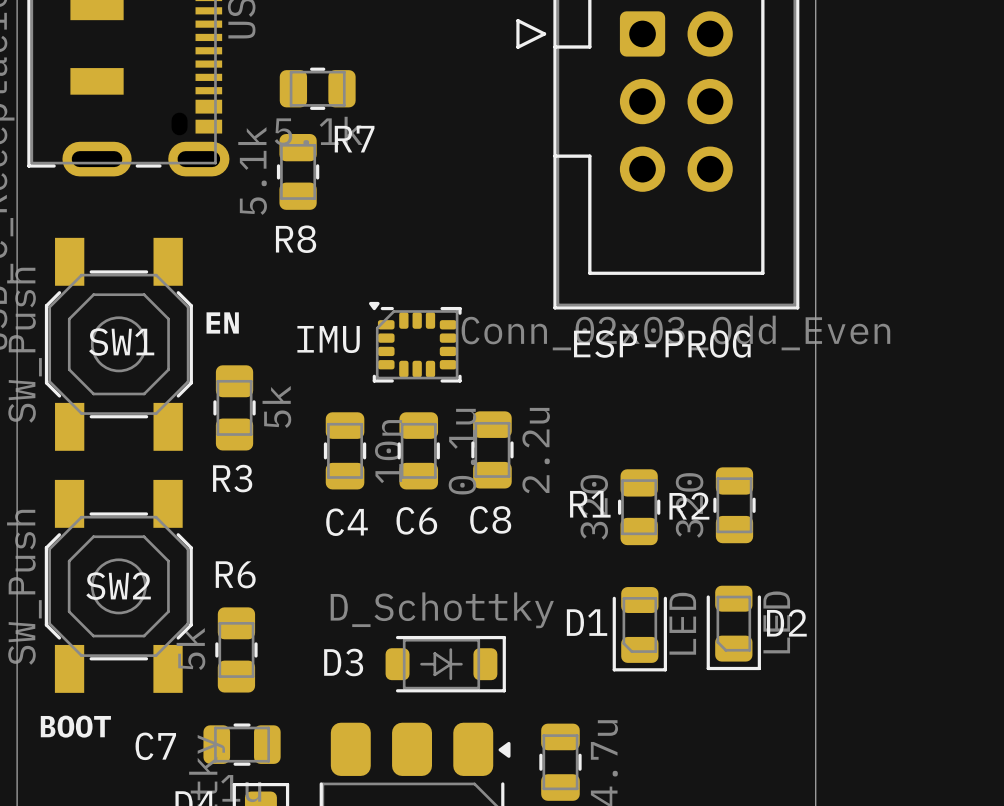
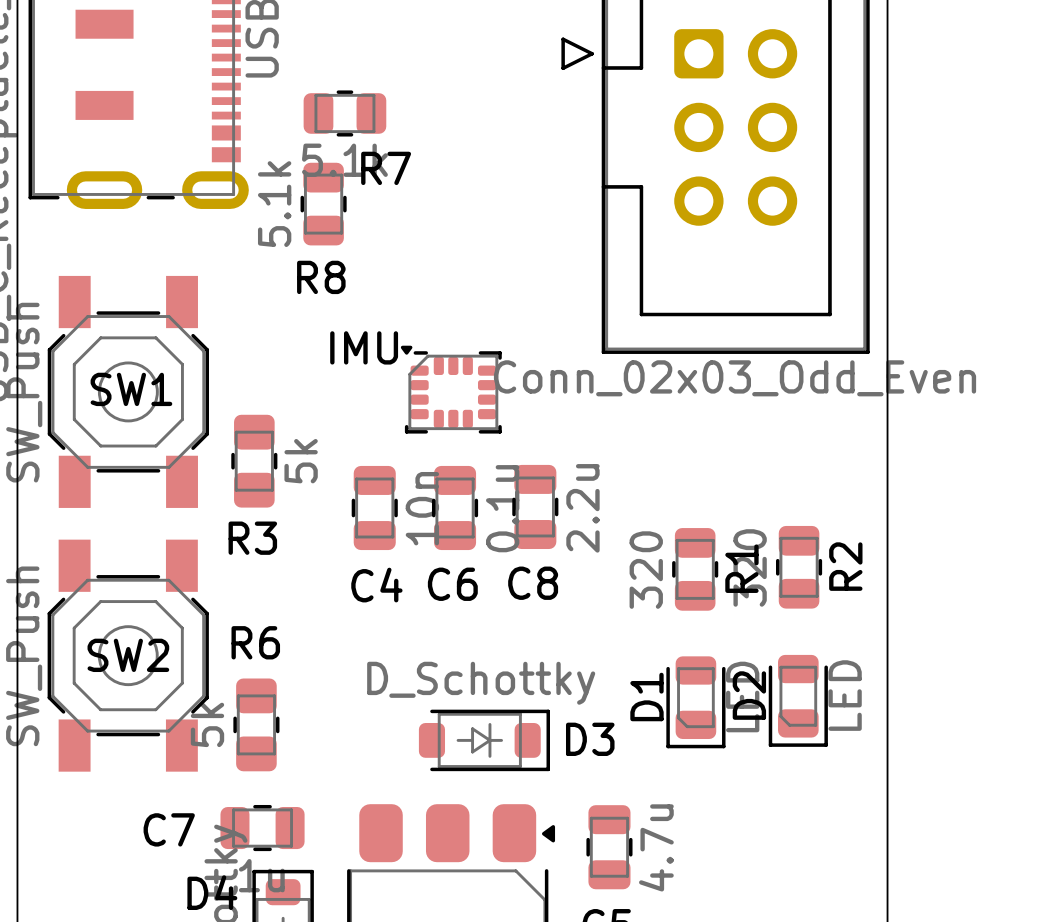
text: EN (222, 322) -> none
IMU name position: IMU (328, 339) -> IMU (364, 347)
text: ESP-PROG (662, 344) -> none
R1 name rotation: 0° (590, 504) -> 90° counterclockwise (741, 568)
R1 name position: R1 (590, 504) -> R1 (741, 568)
R2 name rotation: 0° (689, 506) -> 90° counterclockwise (845, 566)
R2 name position: R2 (689, 506) -> R2 (845, 566)
D1 name rotation: 0° (587, 622) -> 90° counterclockwise (646, 696)
D2 name rotation: 0° (786, 623) -> 90° counterclockwise (749, 695)
D2 name position: D2 (786, 623) -> D2 (749, 695)
D3 name position: D3 (343, 662) -> D3 (590, 739)
text: BOOT (75, 726) -> none

